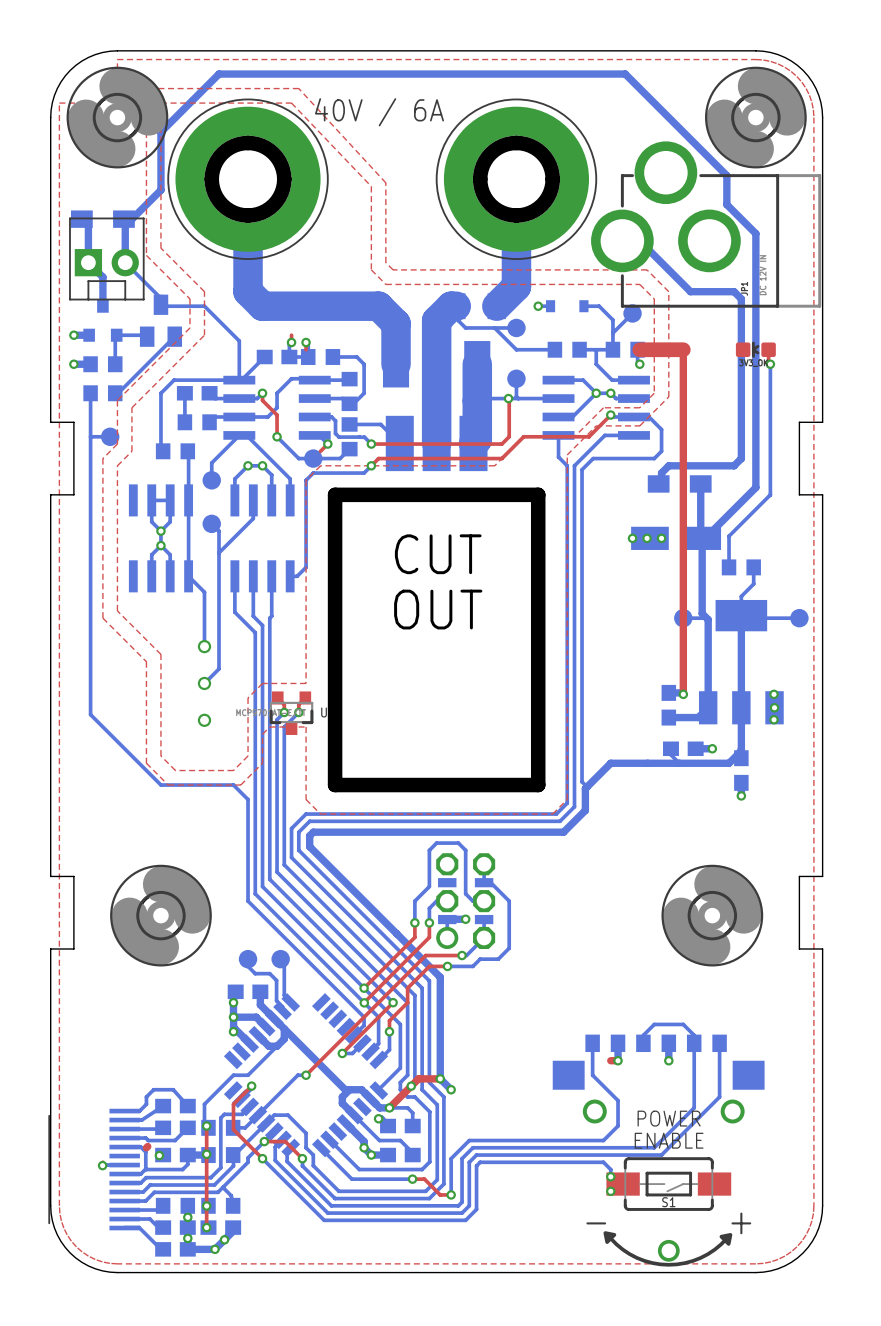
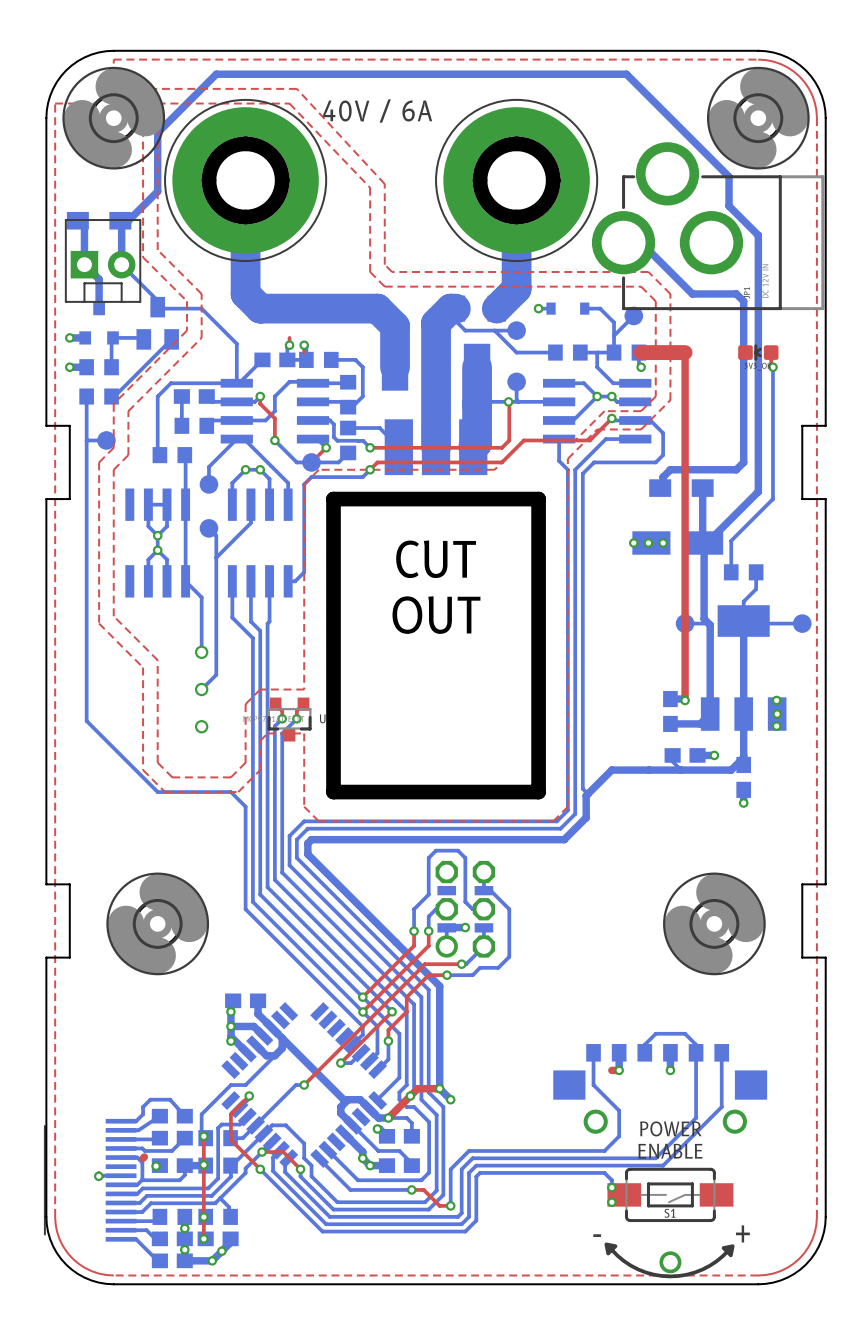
bottom track: (248, 959) (248, 966) (255, 973) (269, 973) (276, 980) (276, 1000) (282, 1006) (282, 1010) -> none
part: (248, 959) -> none
bottom track: (280, 959) (280, 962) (284, 966) (284, 995) (290, 1002) -> none
part: (280, 959) -> none

